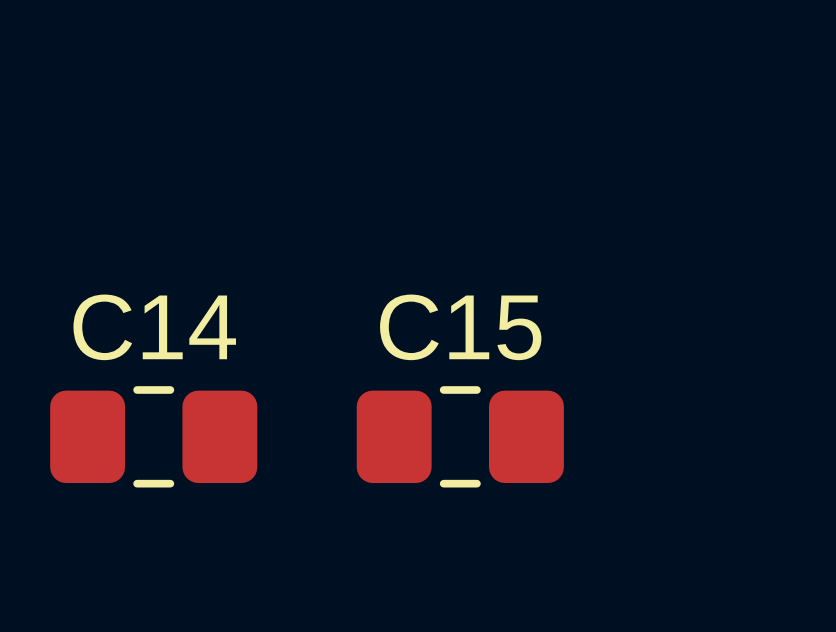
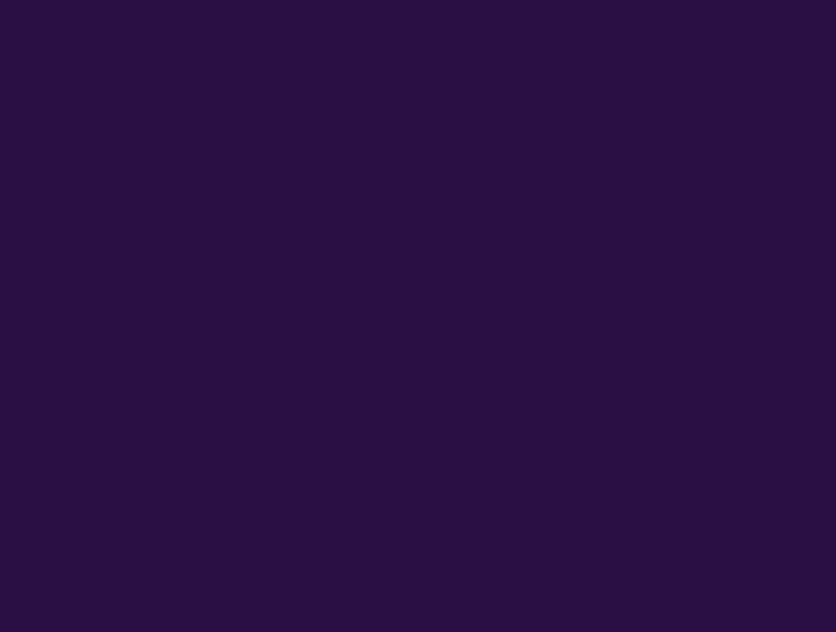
C14: (153, 436) -> none
C15: (460, 436) -> none

